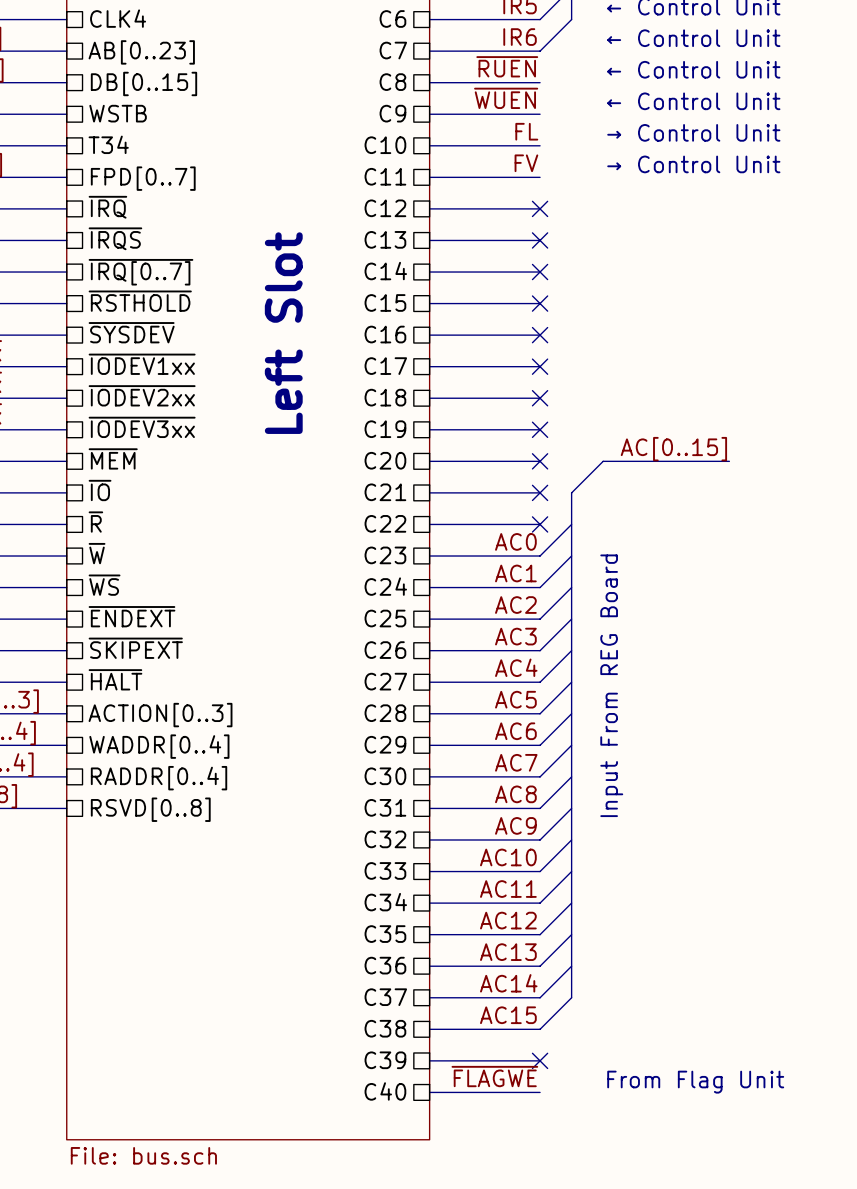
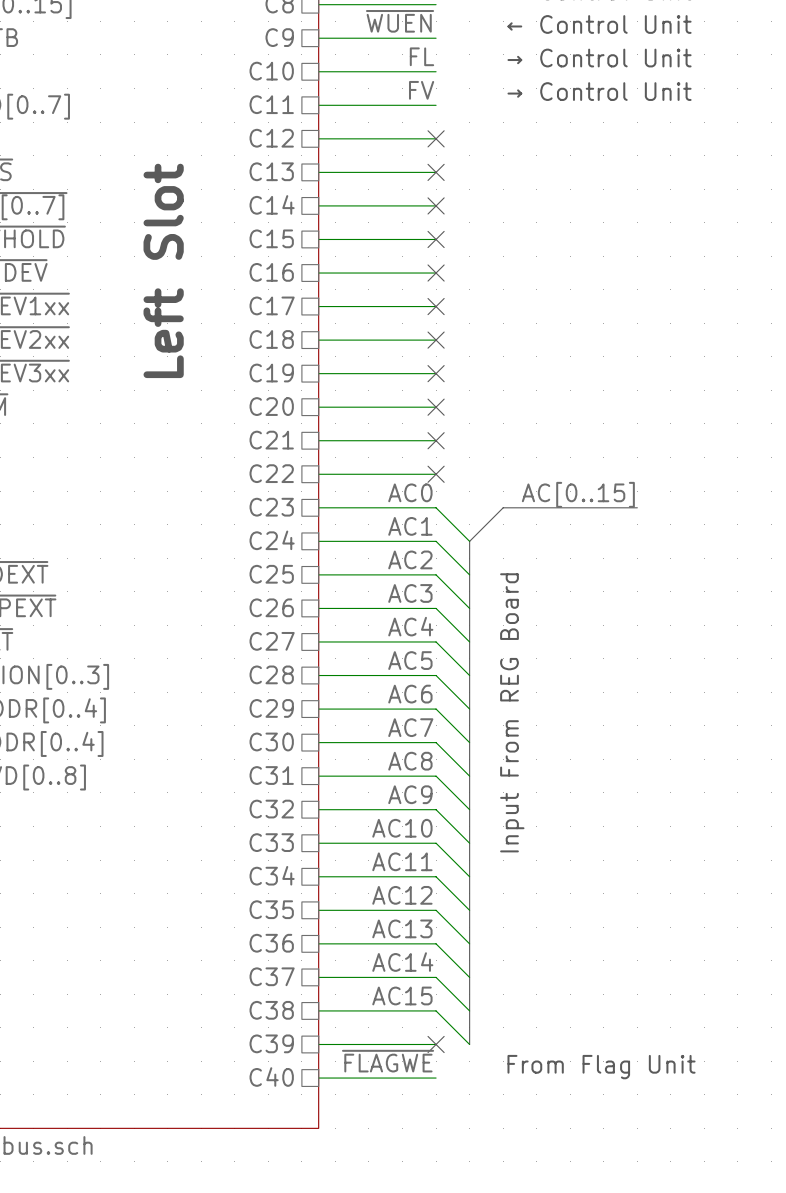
label position: AC[0..15] (673, 449) -> AC[0..15] (578, 494)
bus: (729, 461) (603, 461) (571, 492) (571, 587) -> (637, 507) (503, 507) (469, 541)
wire: (571, 524) (540, 556) -> (469, 541) (436, 507)
wire: (571, 556) (540, 587) -> none
wire: (571, 587) (540, 619) -> (469, 608) (436, 574)
wire: (571, 619) (540, 650) -> (469, 574) (436, 541)
wire: (571, 650) (540, 682) -> (469, 675) (436, 641)
wire: (571, 682) (540, 713) -> (469, 641) (436, 608)
text position: Input From REG Board (611, 685) -> Input From REG Board (512, 712)
wire: (571, 713) (540, 745) -> (469, 742) (436, 709)
wire: (571, 745) (540, 776) -> (469, 709) (436, 675)
wire: (571, 776) (540, 808) -> (469, 809) (436, 776)
wire: (571, 808) (540, 839) -> (469, 776) (436, 742)
wire: none -> (436, 809) (469, 843)
wire: (571, 839) (540, 871) -> none
wire: (571, 871) (540, 903) -> (469, 910) (436, 876)
wire: (571, 903) (540, 934) -> (469, 876) (436, 843)
wire: none -> (436, 910) (469, 943)
wire: (571, 934) (540, 966) -> (469, 977) (436, 943)
wire: (571, 966) (540, 997) -> (469, 1010) (436, 977)
bus: none -> (469, 977) (469, 1044)
wire: (571, 997) (540, 1029) -> (469, 1044) (436, 1010)

